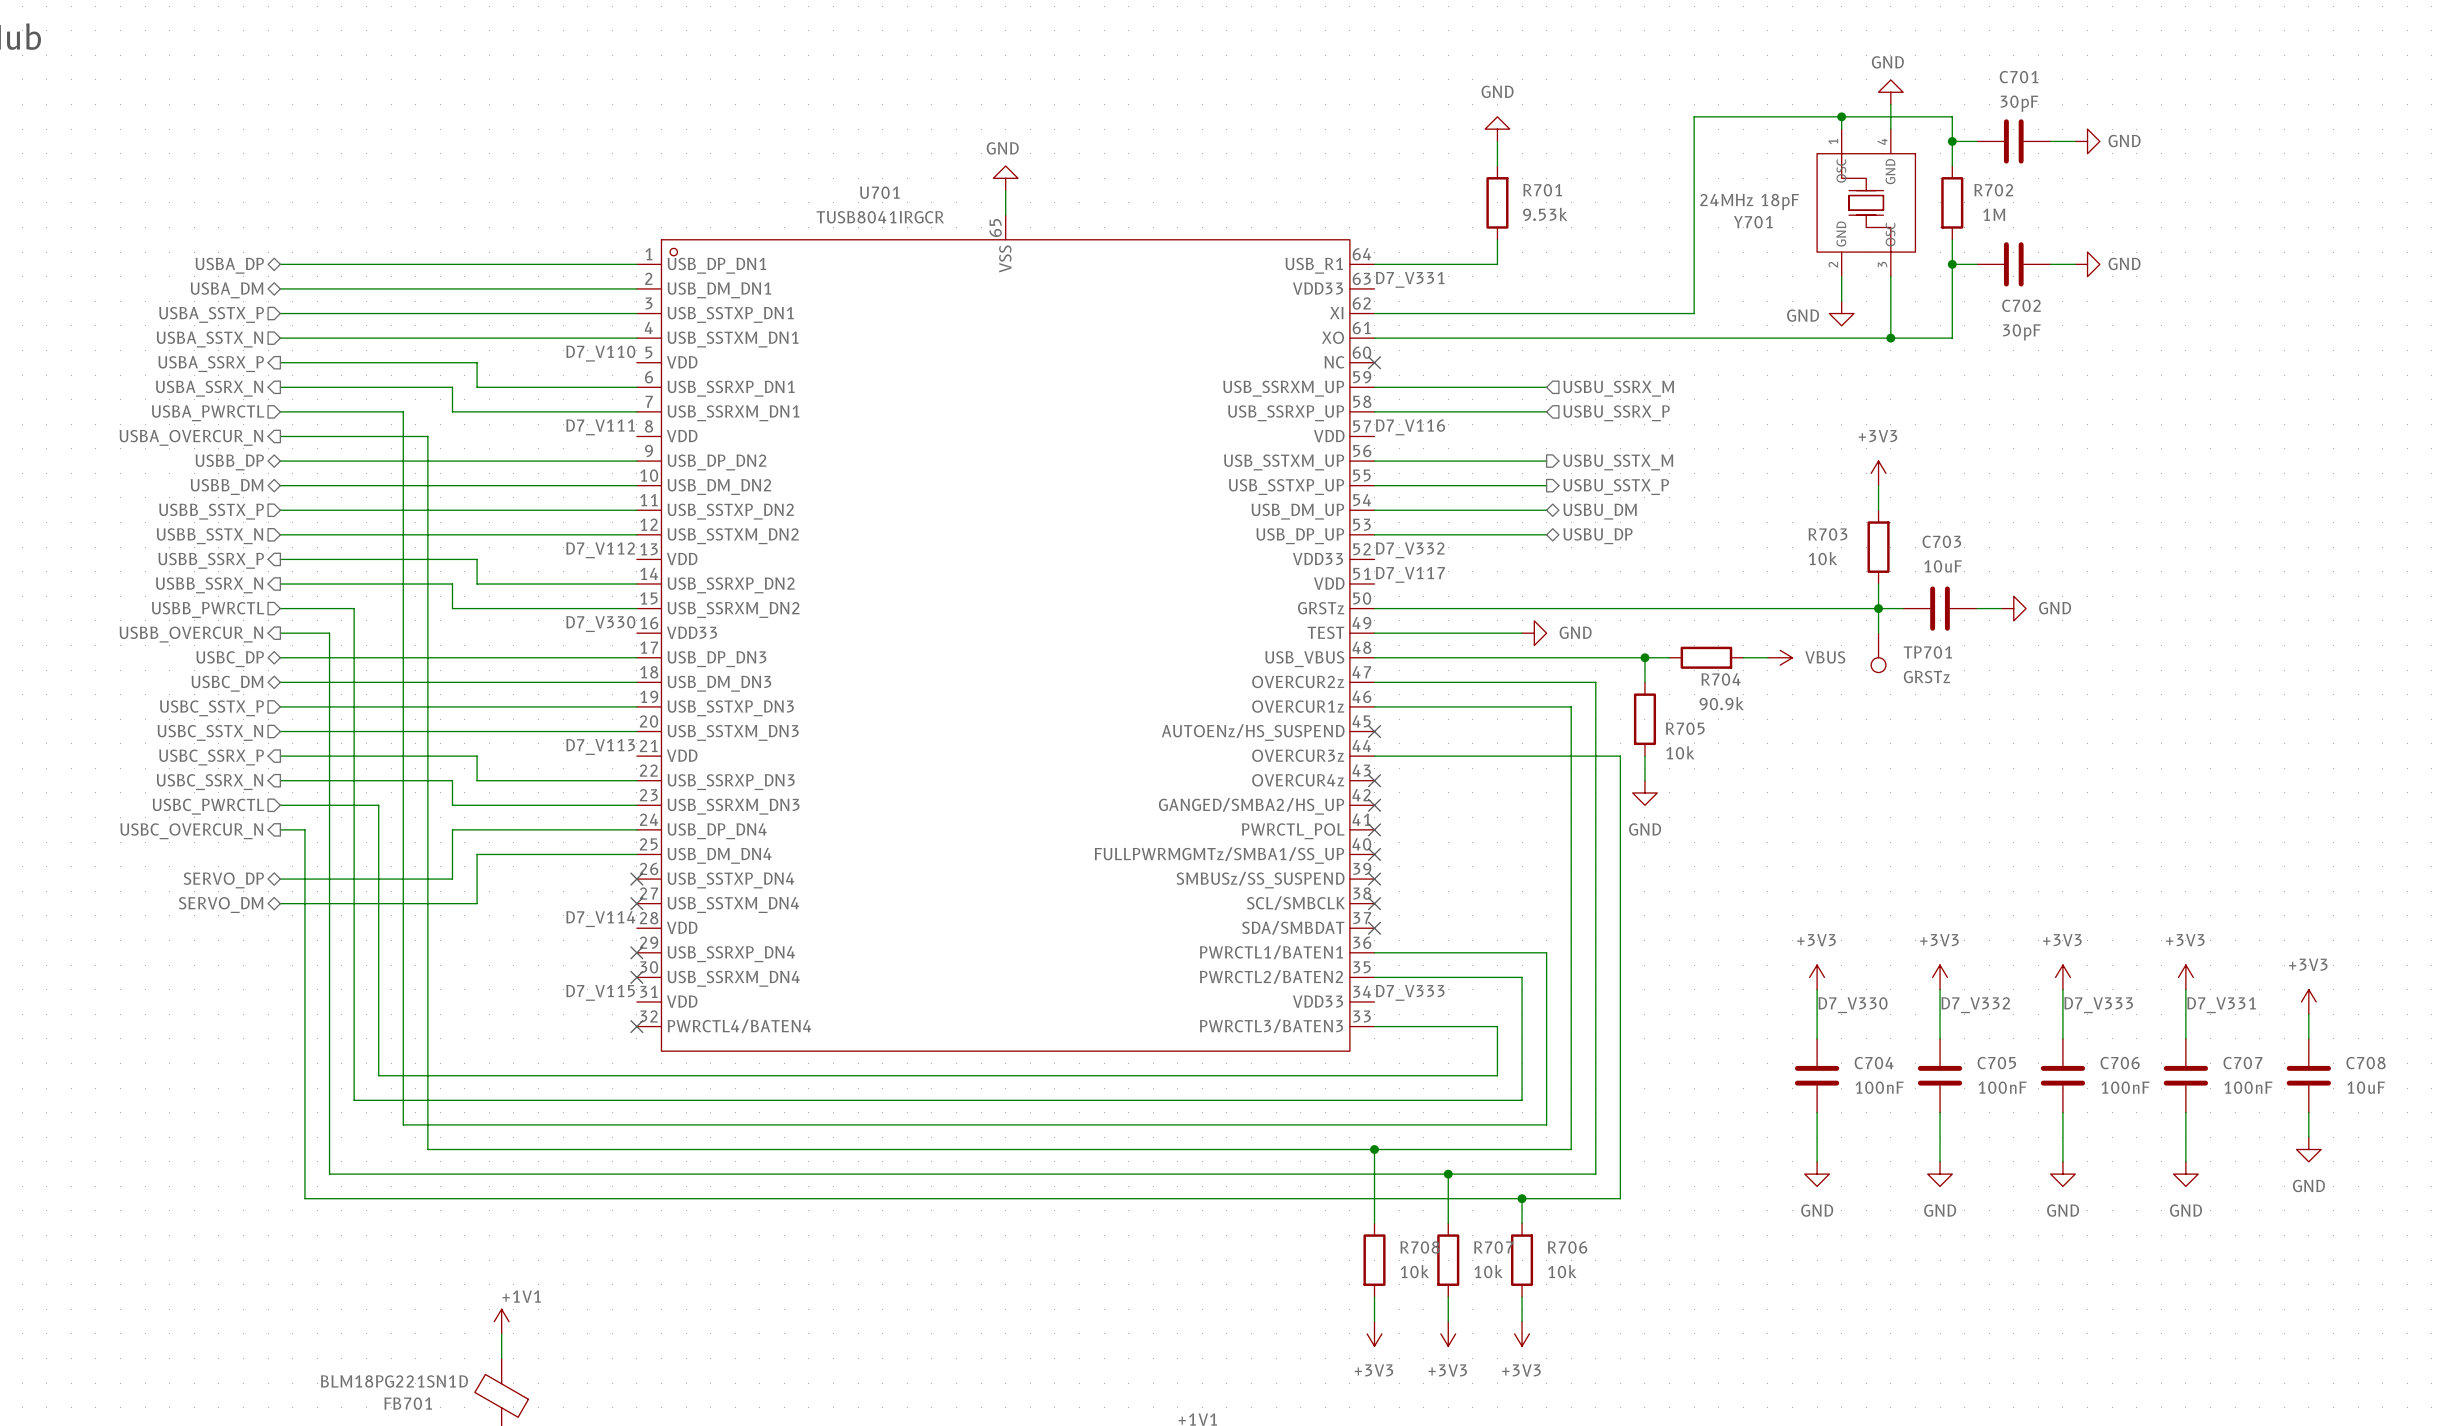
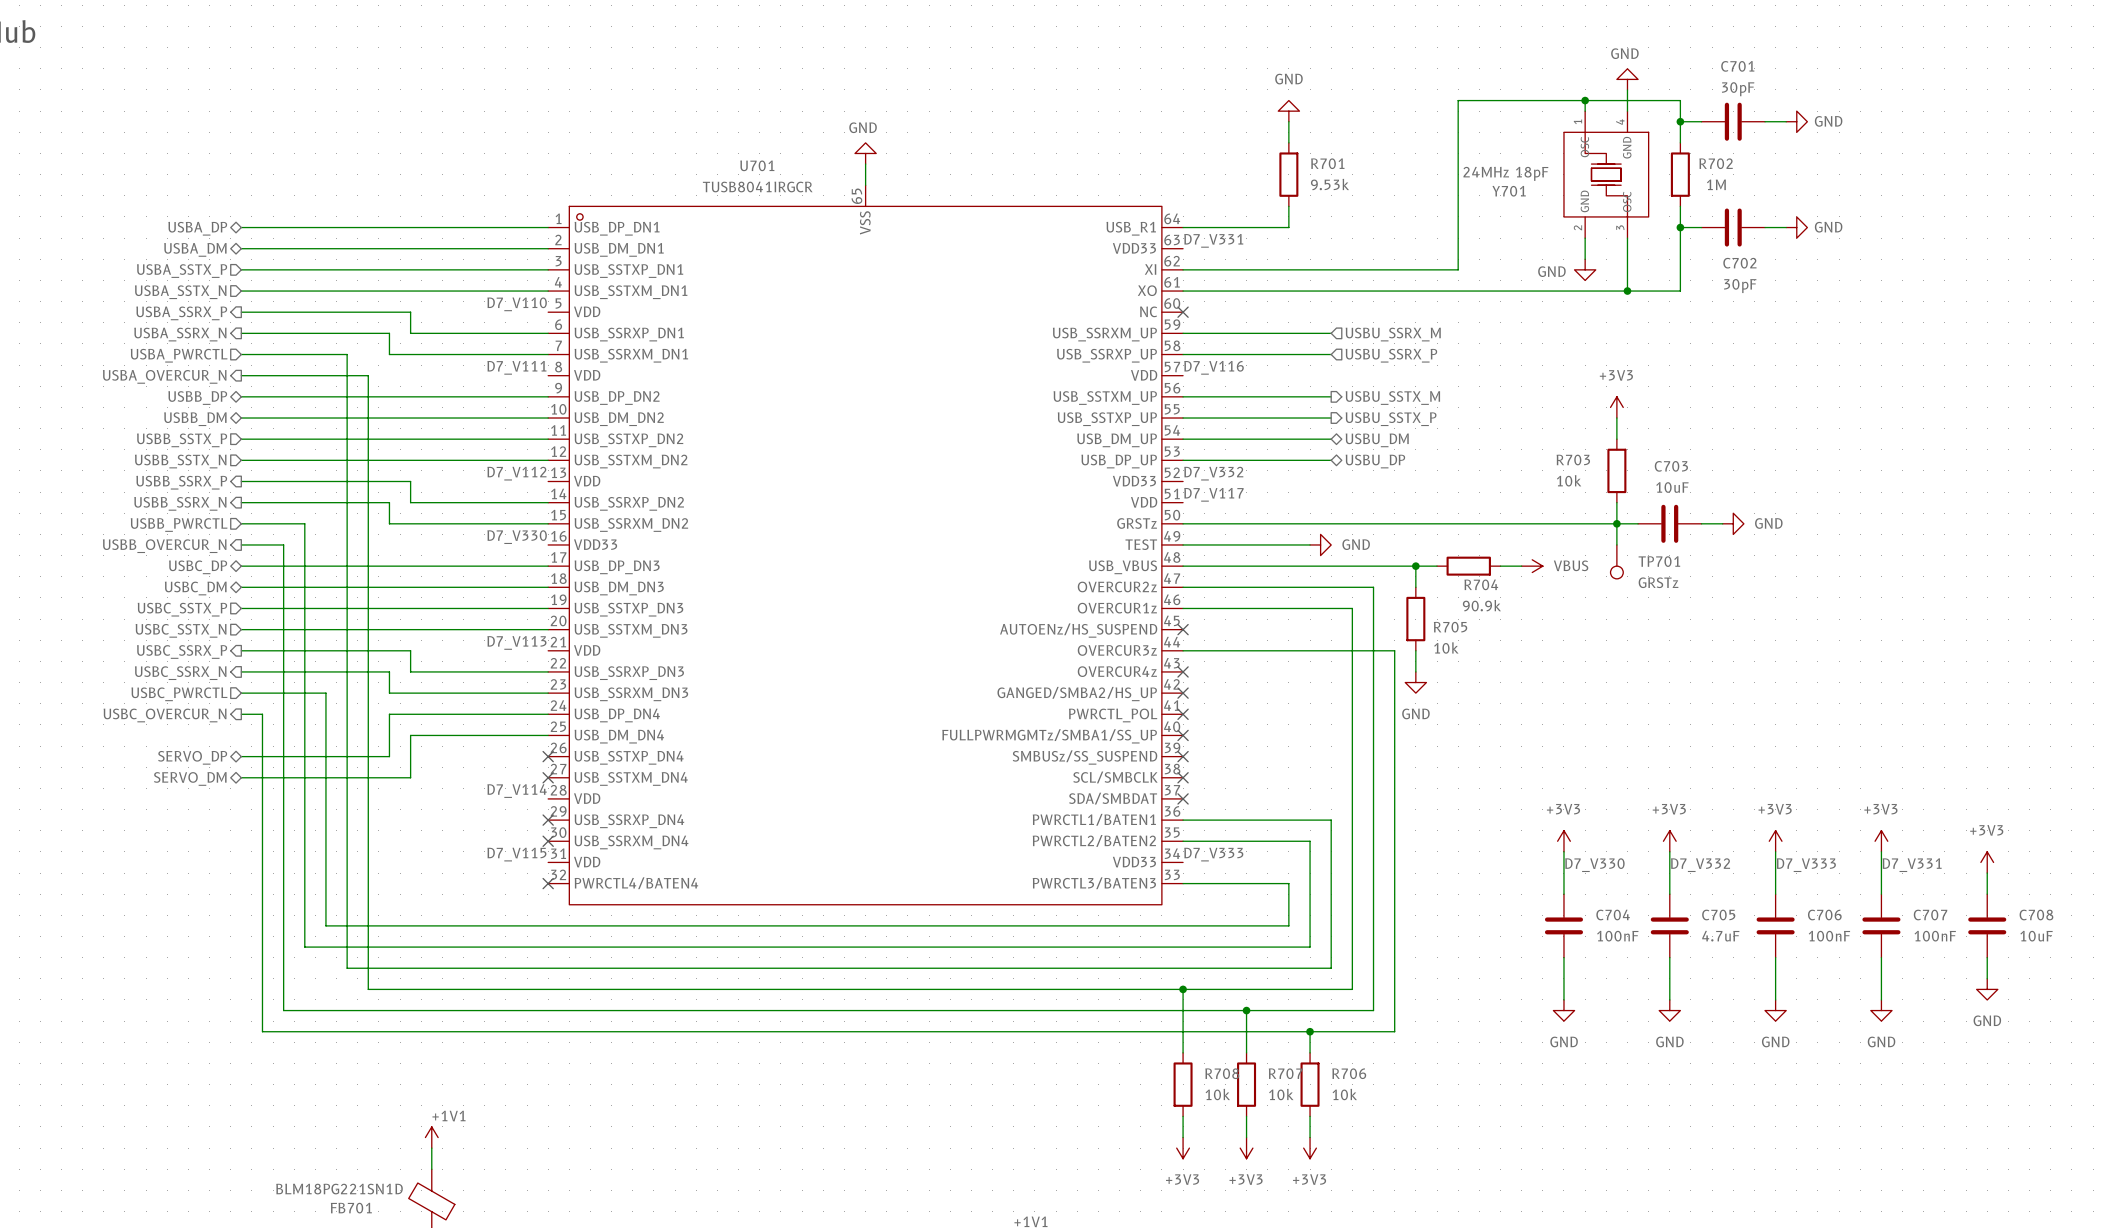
C705 value: 100nF (2002, 1087) -> 4.7uF (1720, 936)

